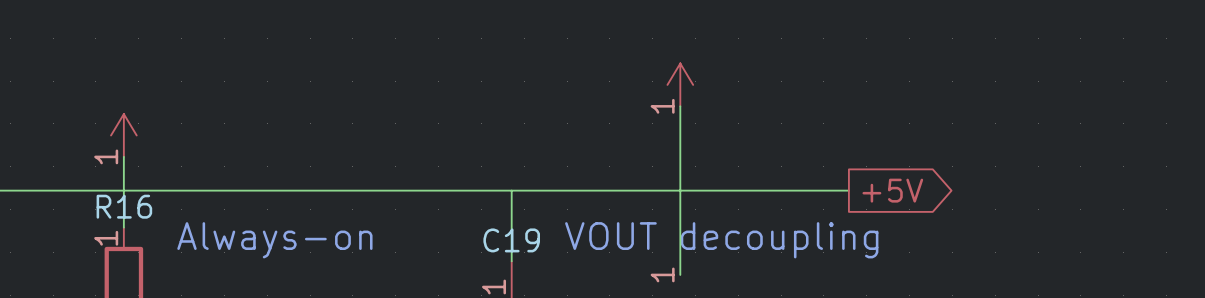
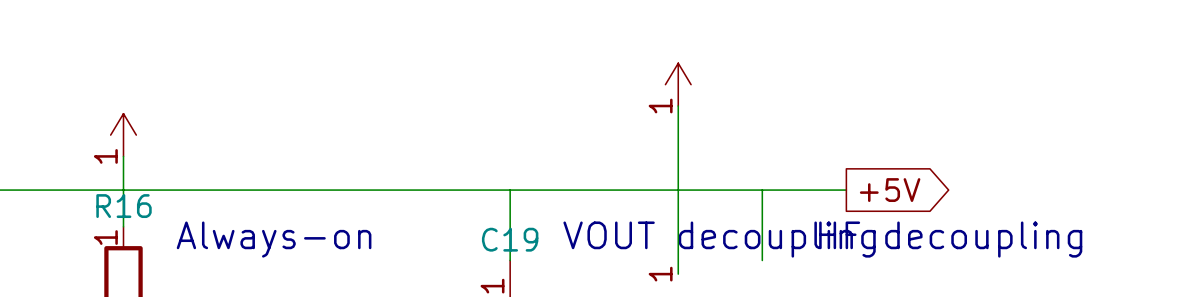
wire: none -> (762, 190) (762, 260)
text: none -> HF decoupling (950, 239)

